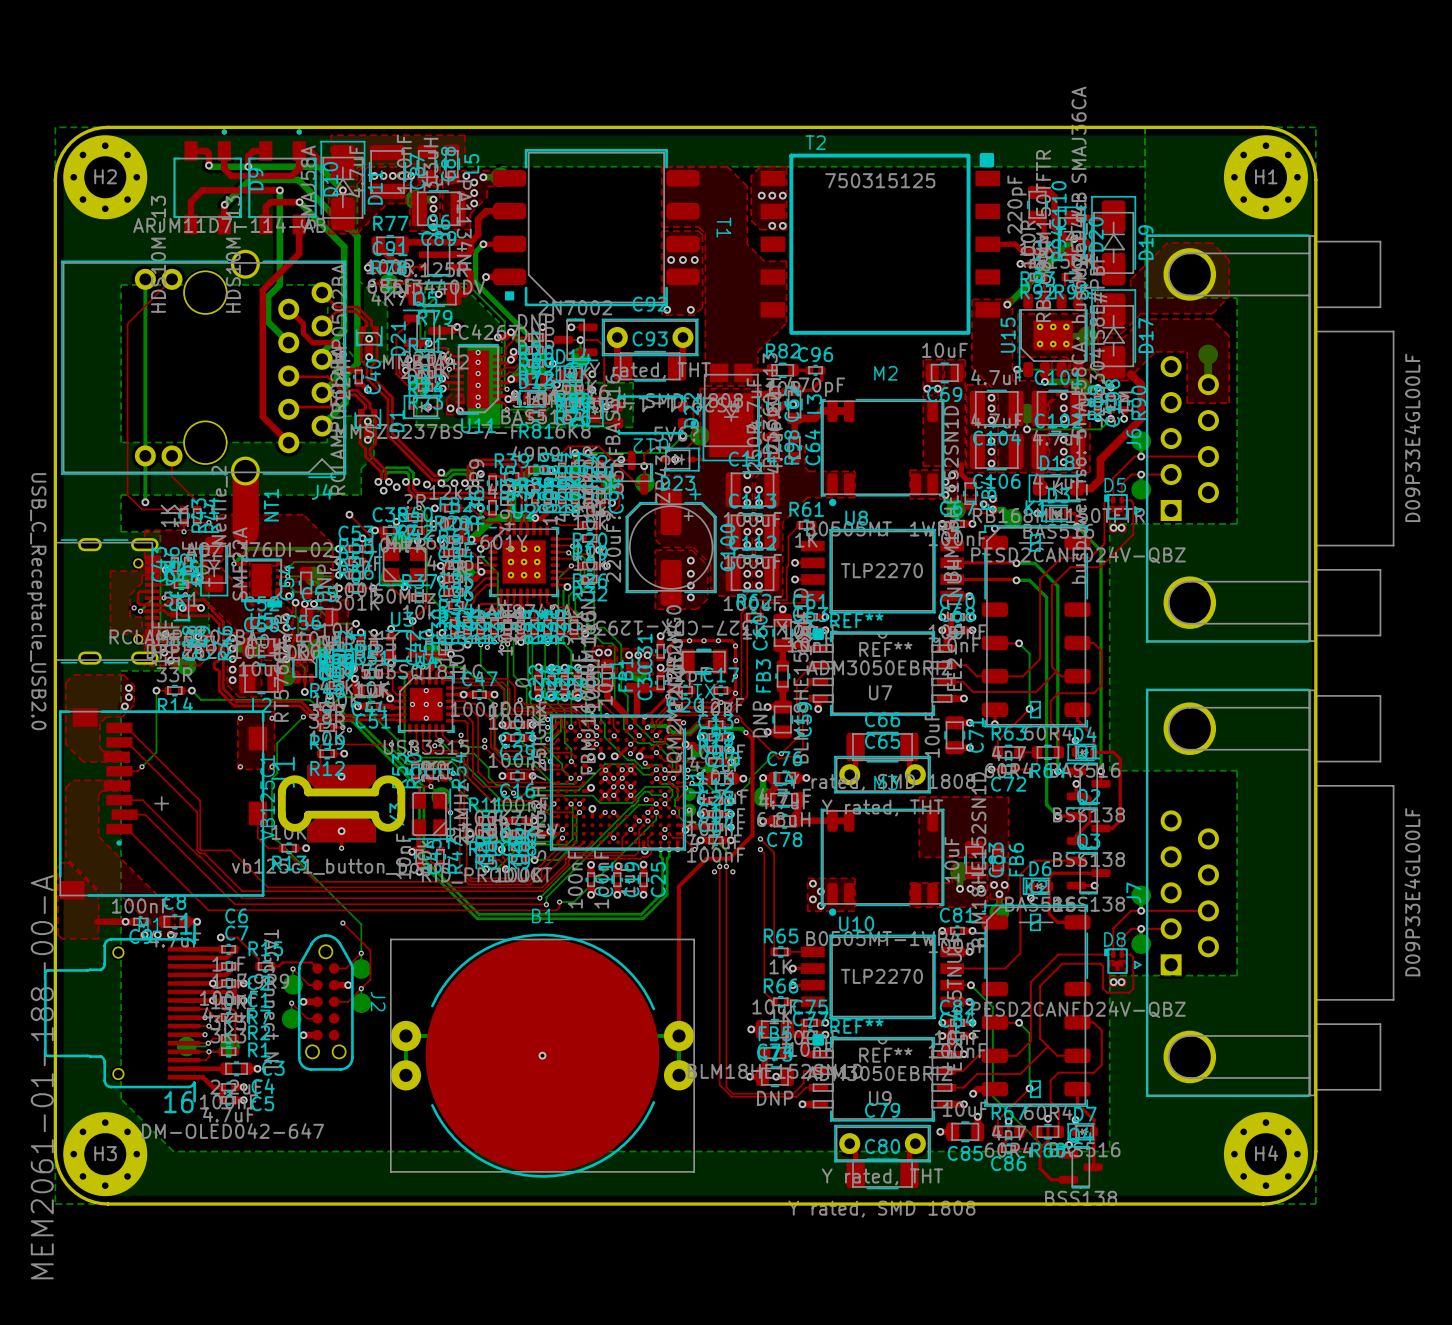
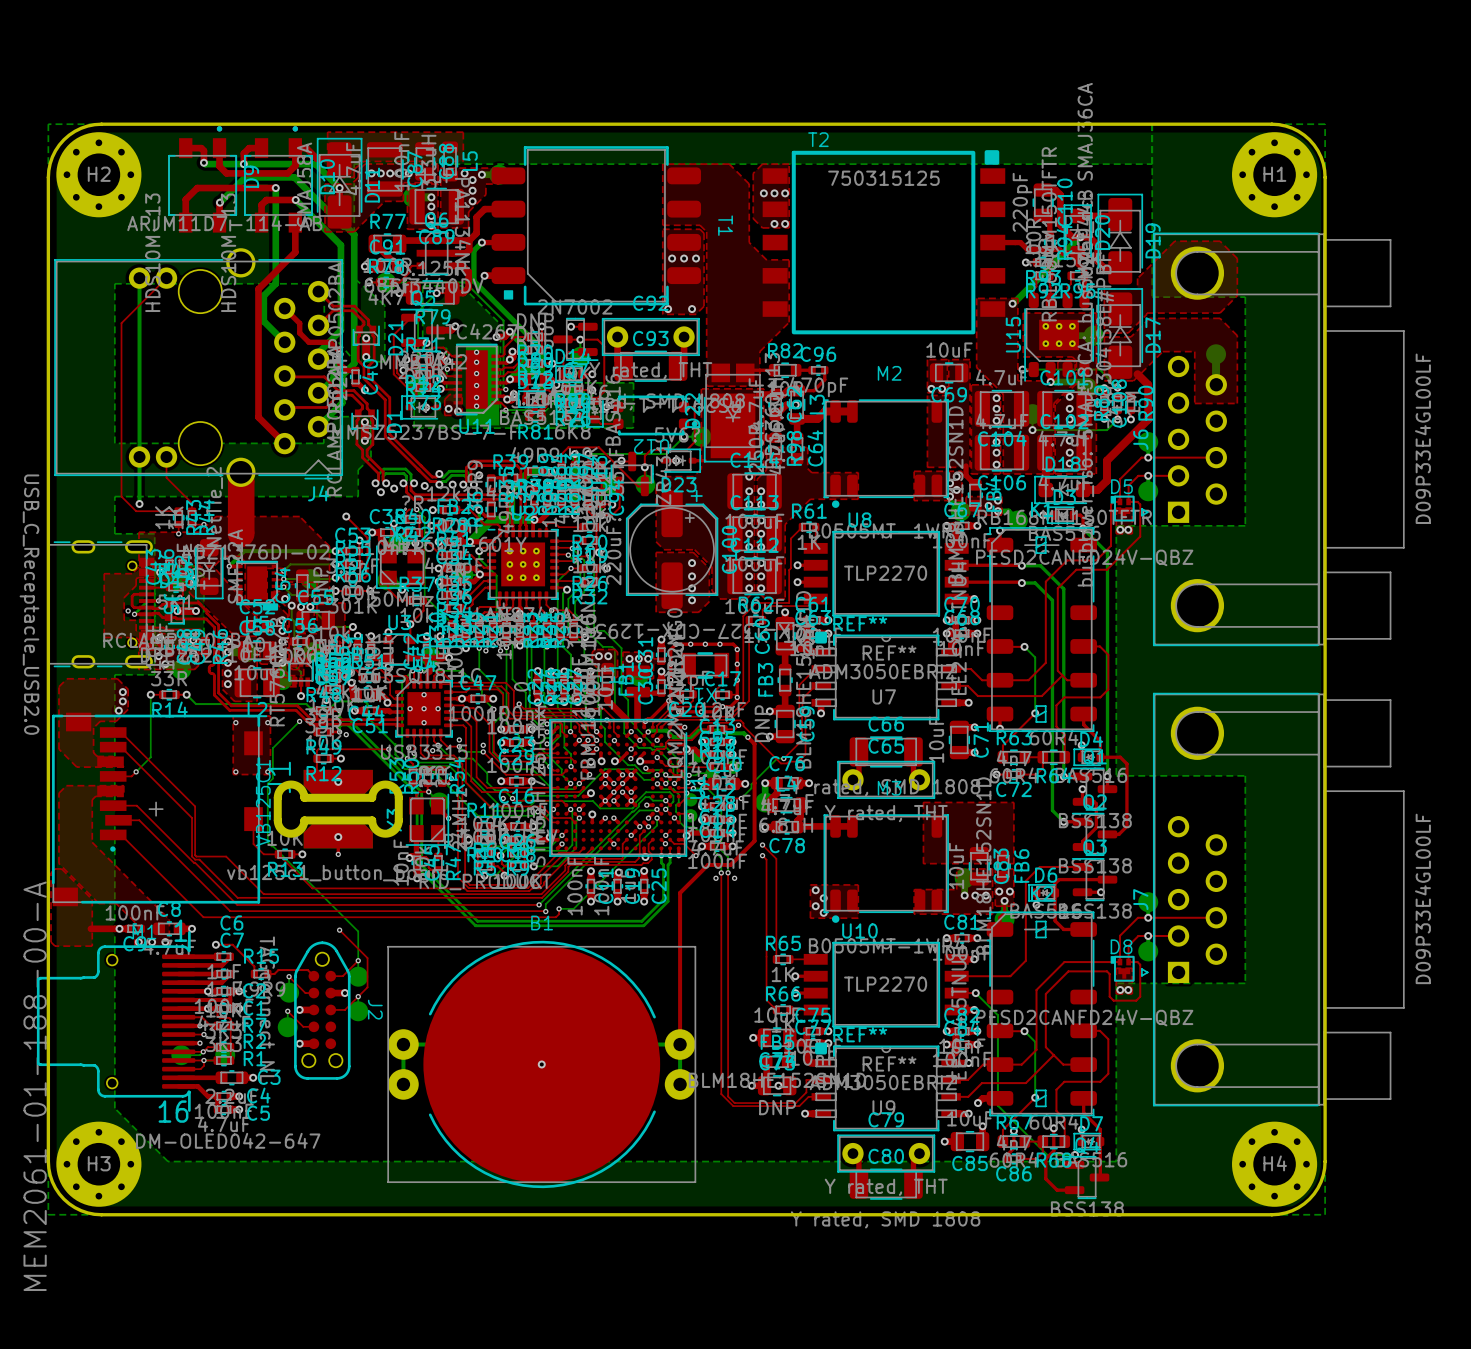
NT1 name: NT1 (271, 505) -> none

